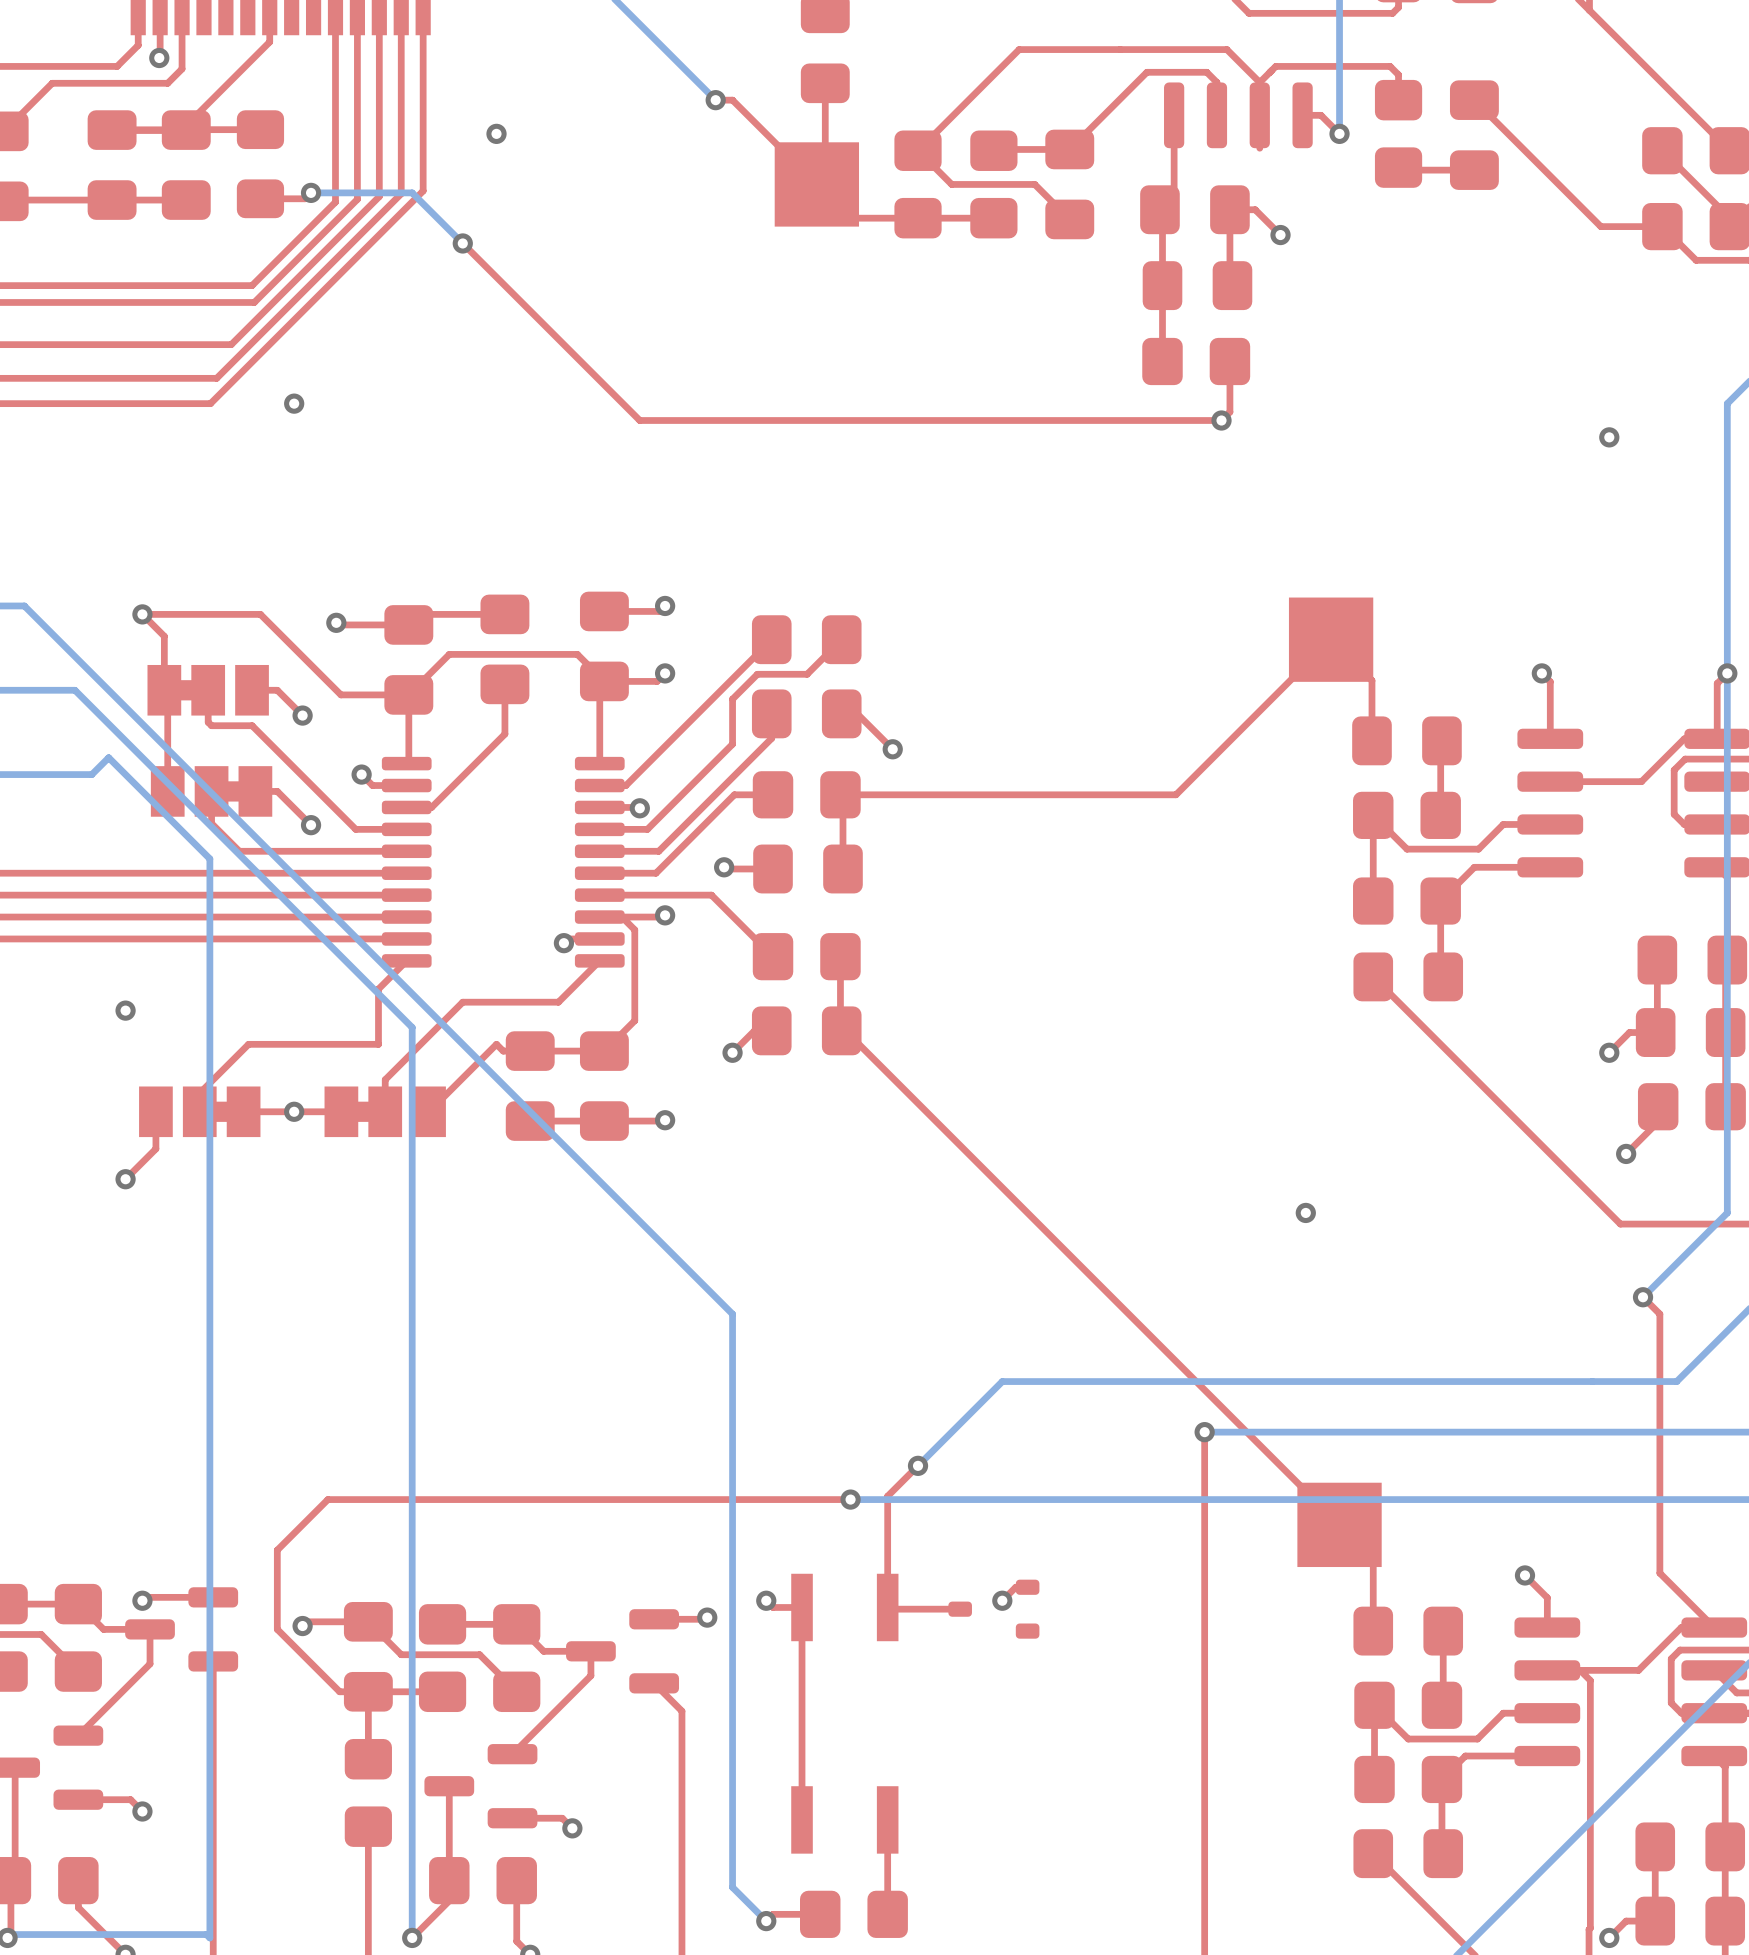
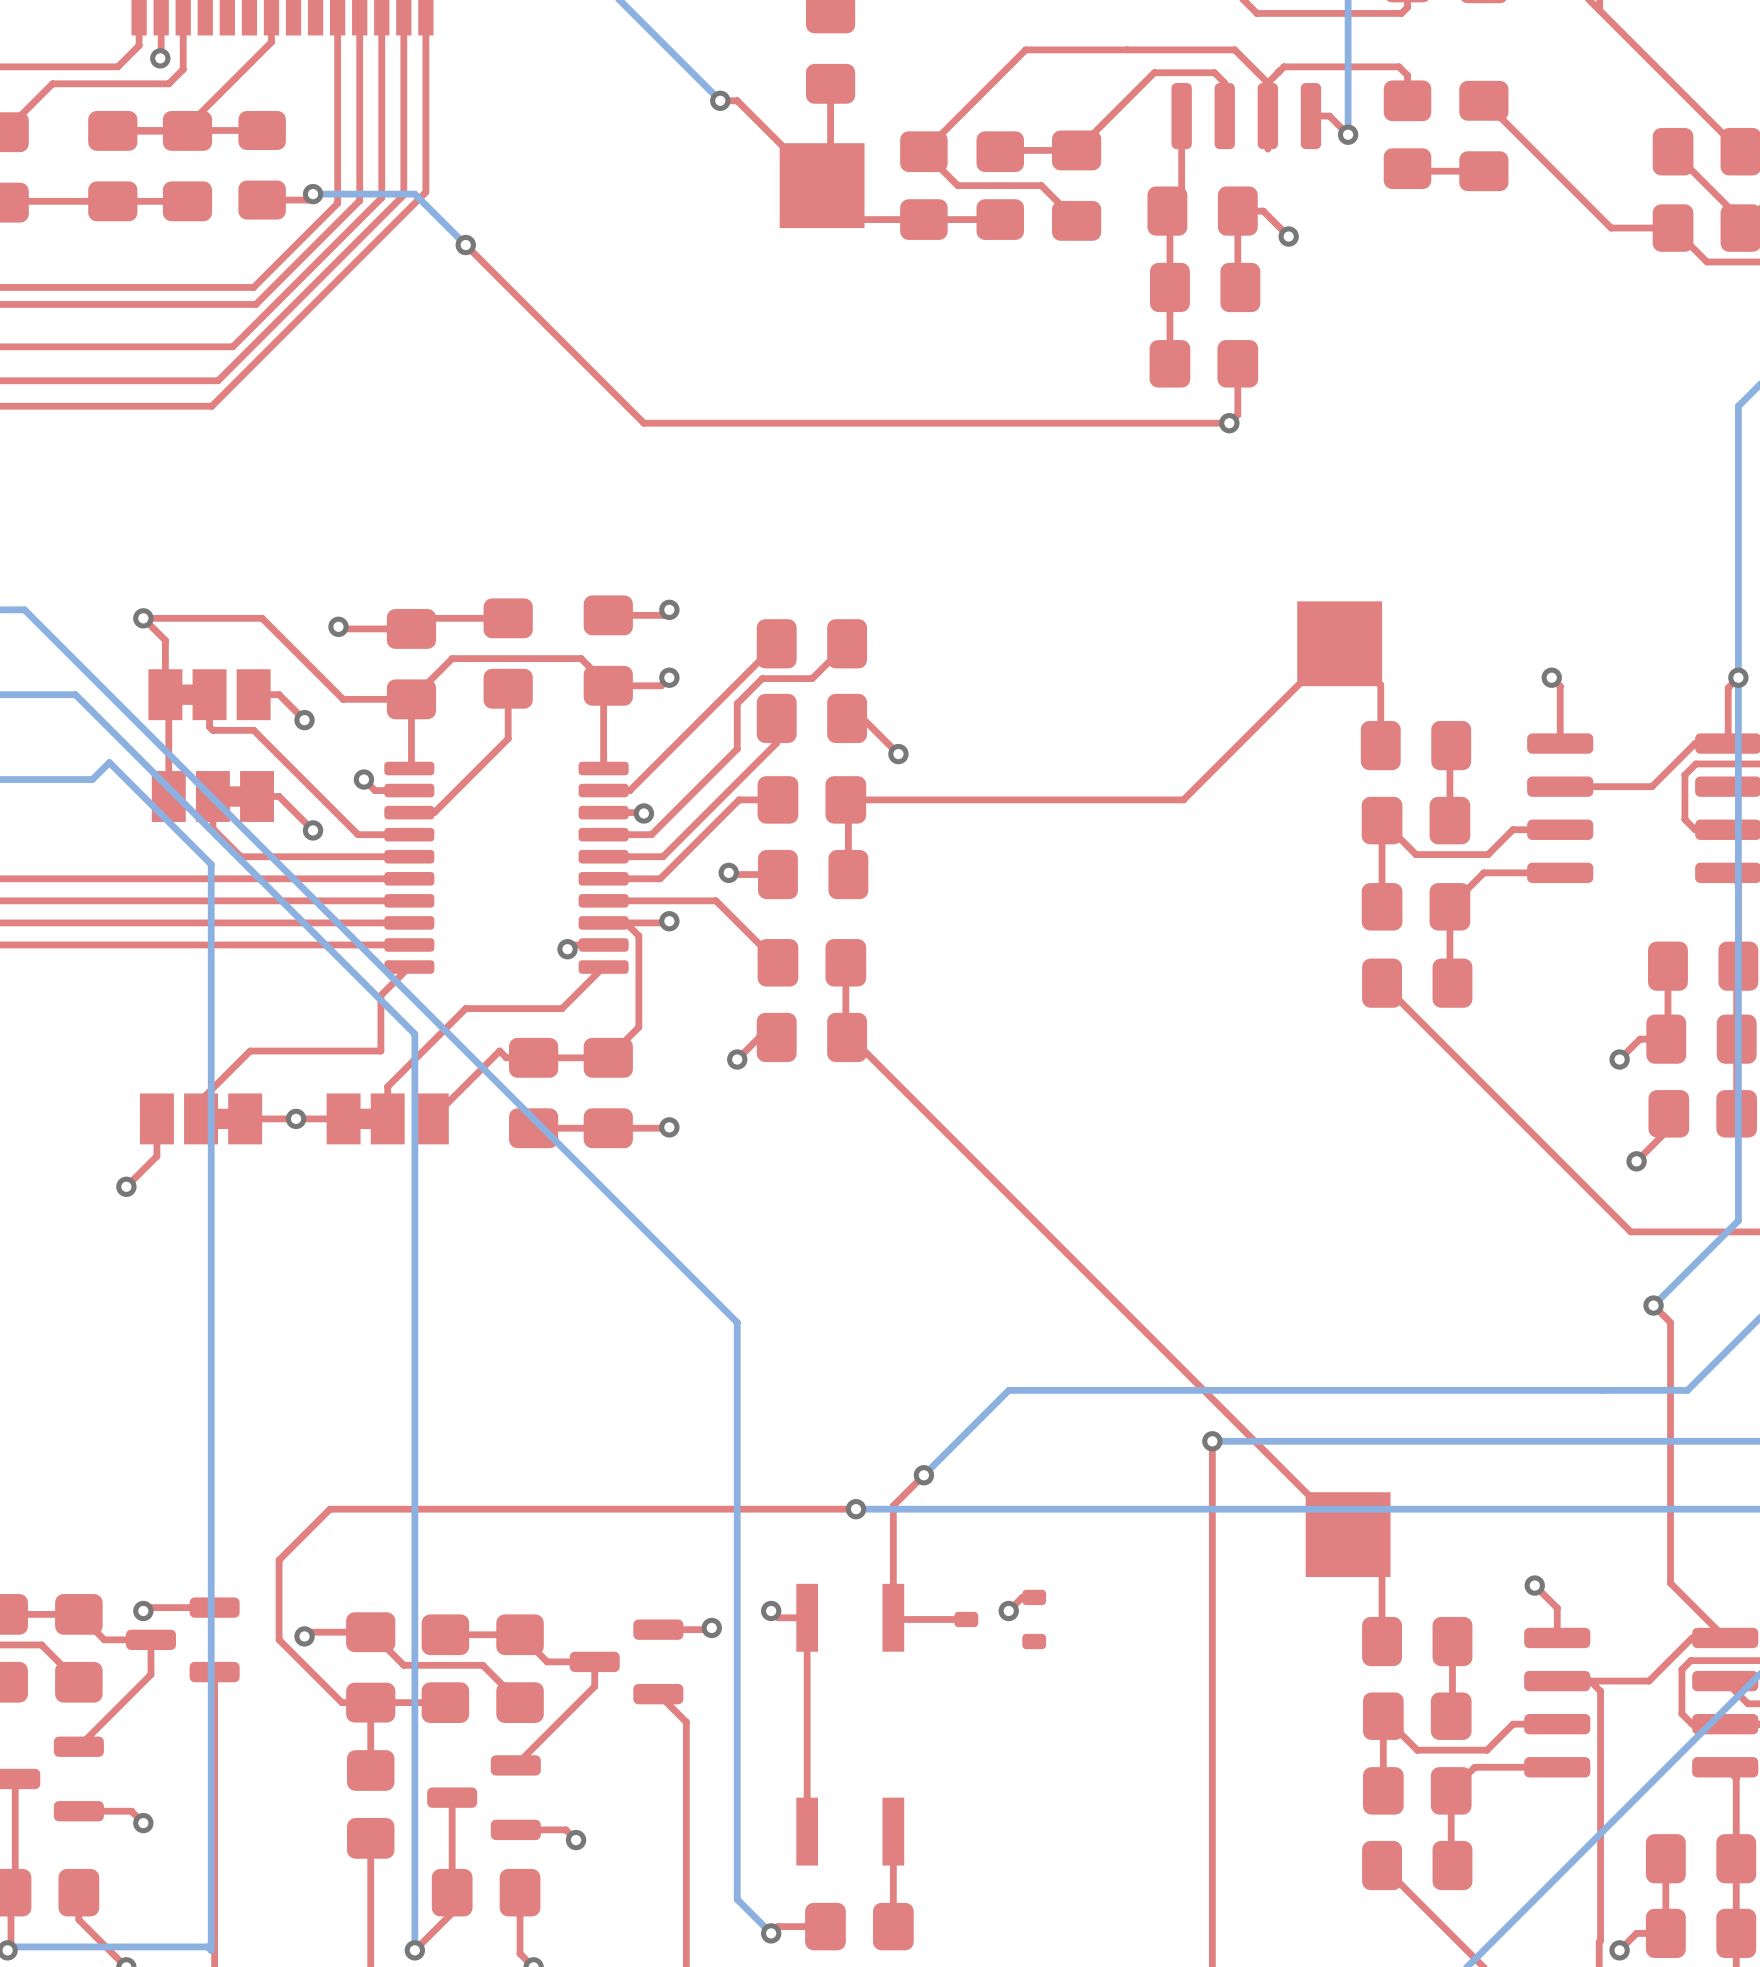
via: (496, 133) -> none
via: (294, 403) -> none
via: (1609, 437) -> none
via: (125, 1010) -> none
via: (1305, 1212) -> none

